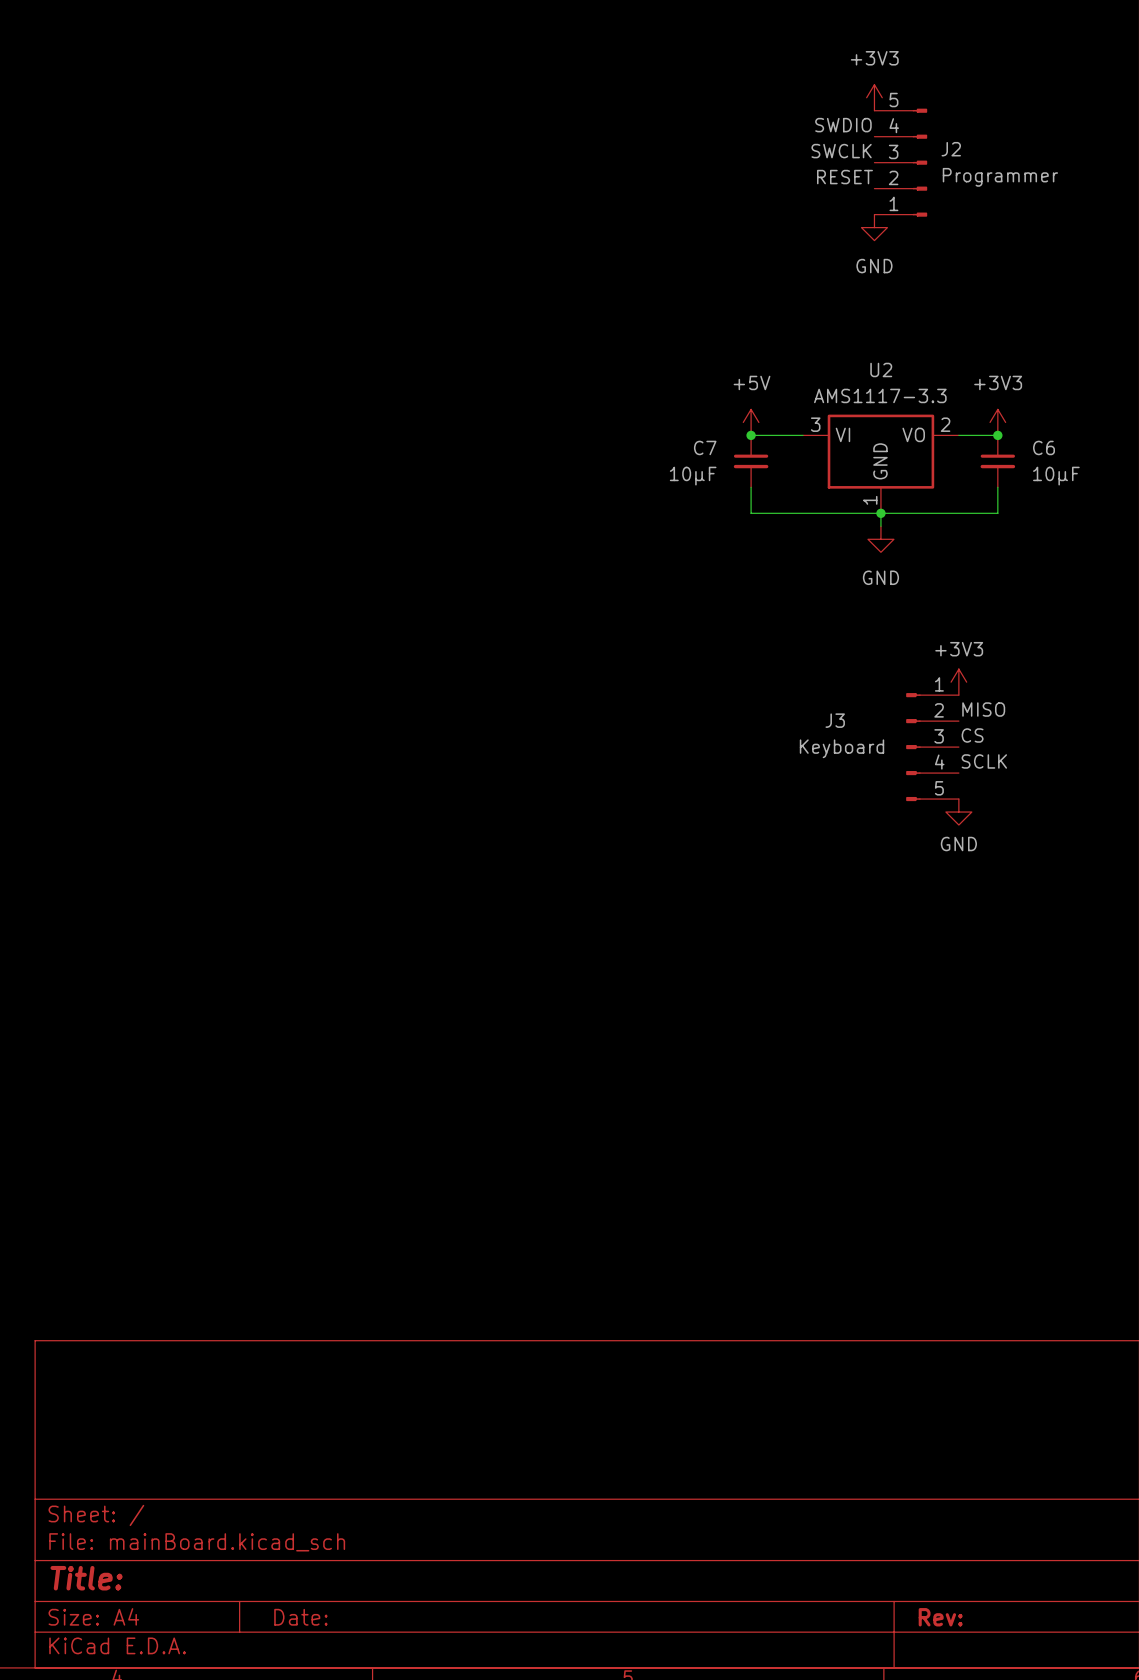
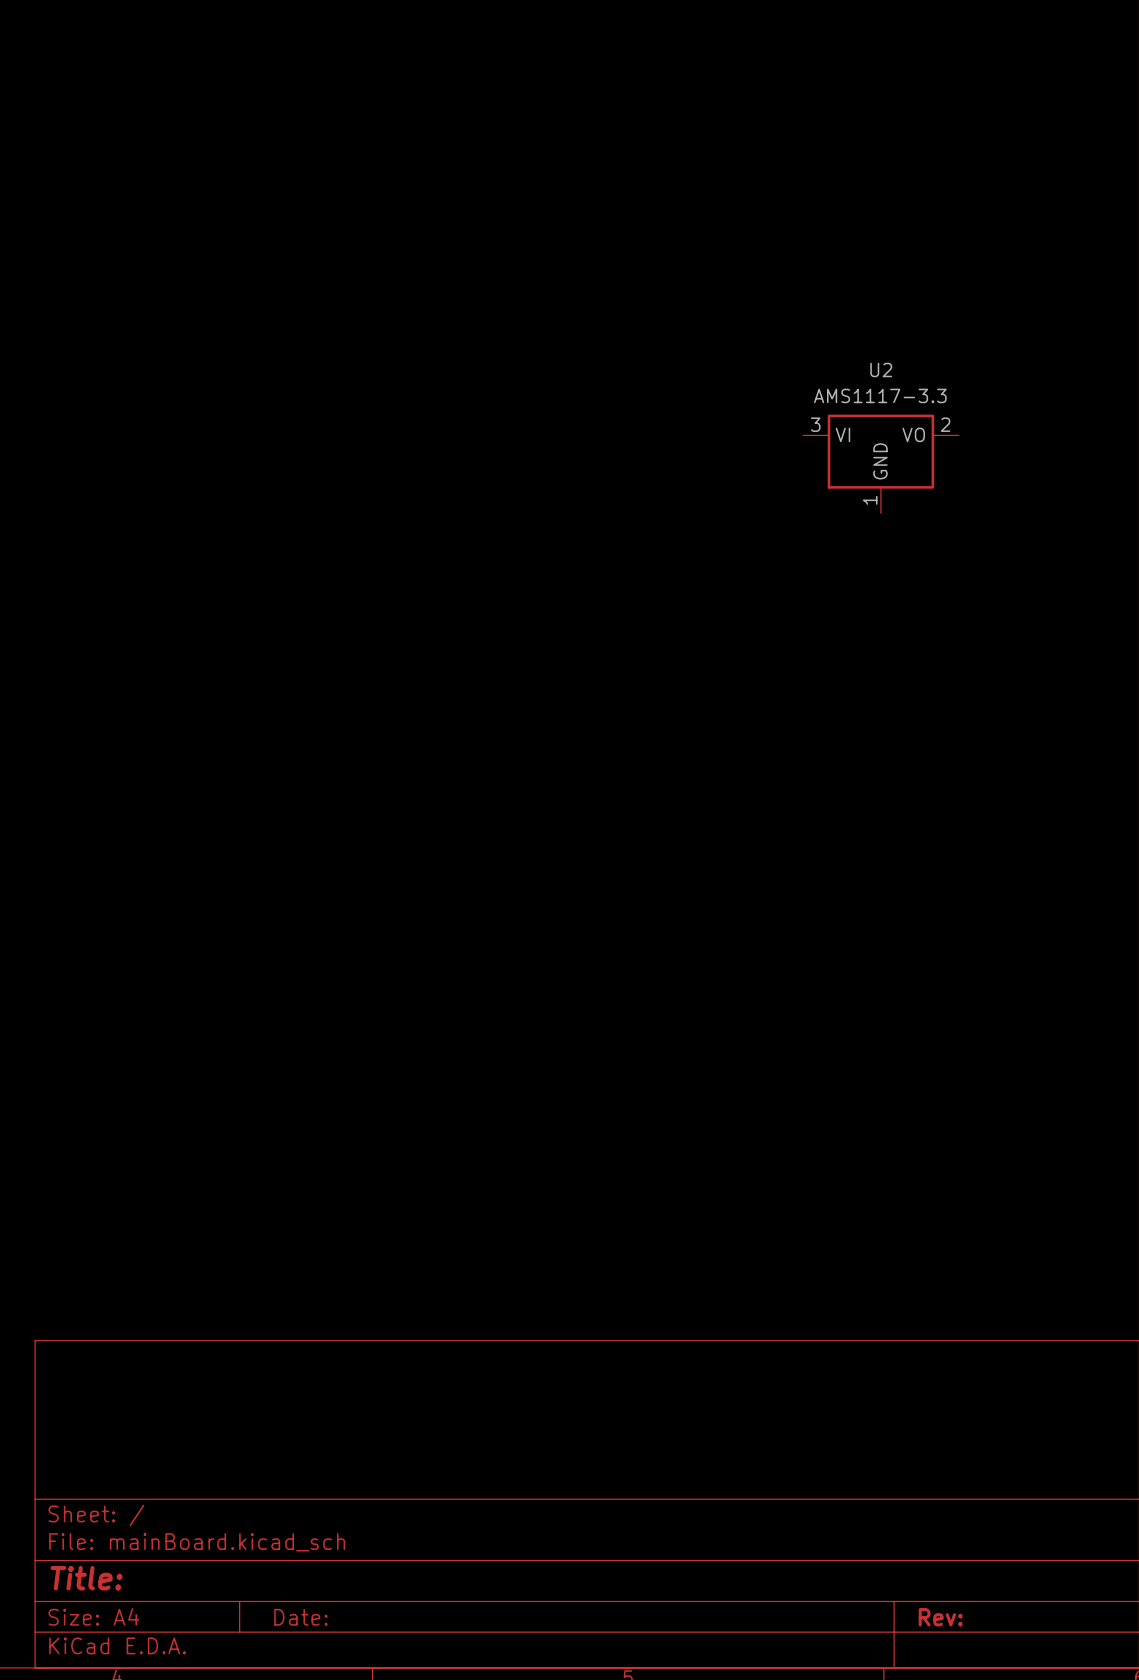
power symbol: +3V3 (874, 97) -> none
label: SWDIO (843, 125) -> none
label: SWCLK (841, 151) -> none
J2: Programmer (900, 162) -> none
label: RESET (844, 177) -> none
power symbol: GND (874, 227) -> none
power symbol: +5V (751, 422) -> none
power symbol: +3V3 (997, 422) -> none
wire: (751, 435) (803, 435) -> none
junction: (751, 435) -> none
wire: (958, 435) (997, 435) -> none
junction: (997, 435) -> none
C7: 10µF (751, 461) -> none
C6: 10µF (997, 461) -> none
wire: (751, 487) (751, 513) (997, 513) (997, 487) -> none
wire: (880, 513) (880, 526) -> none
junction: (880, 513) -> none
power symbol: GND (880, 539) -> none
power symbol: +3V3 (958, 682) -> none
label: MISO (983, 709) -> none
label: CS (972, 735) -> none
J3: Keyboard (932, 747) -> none
label: SCLK (984, 761) -> none
power symbol: GND (958, 812) -> none

